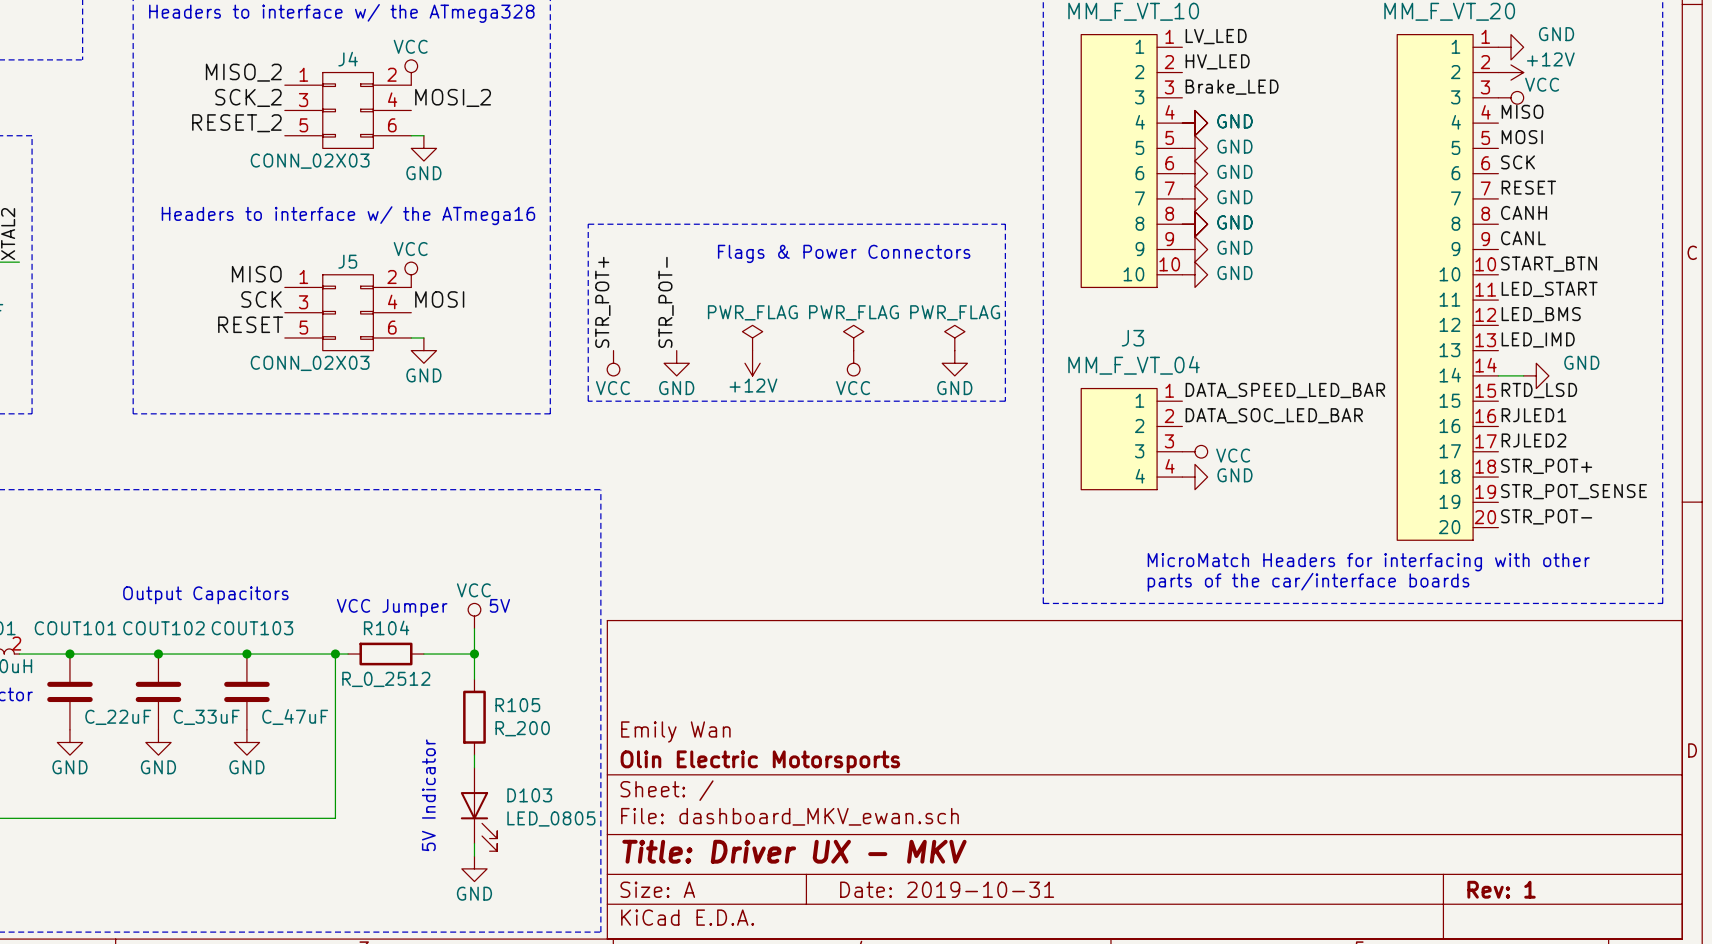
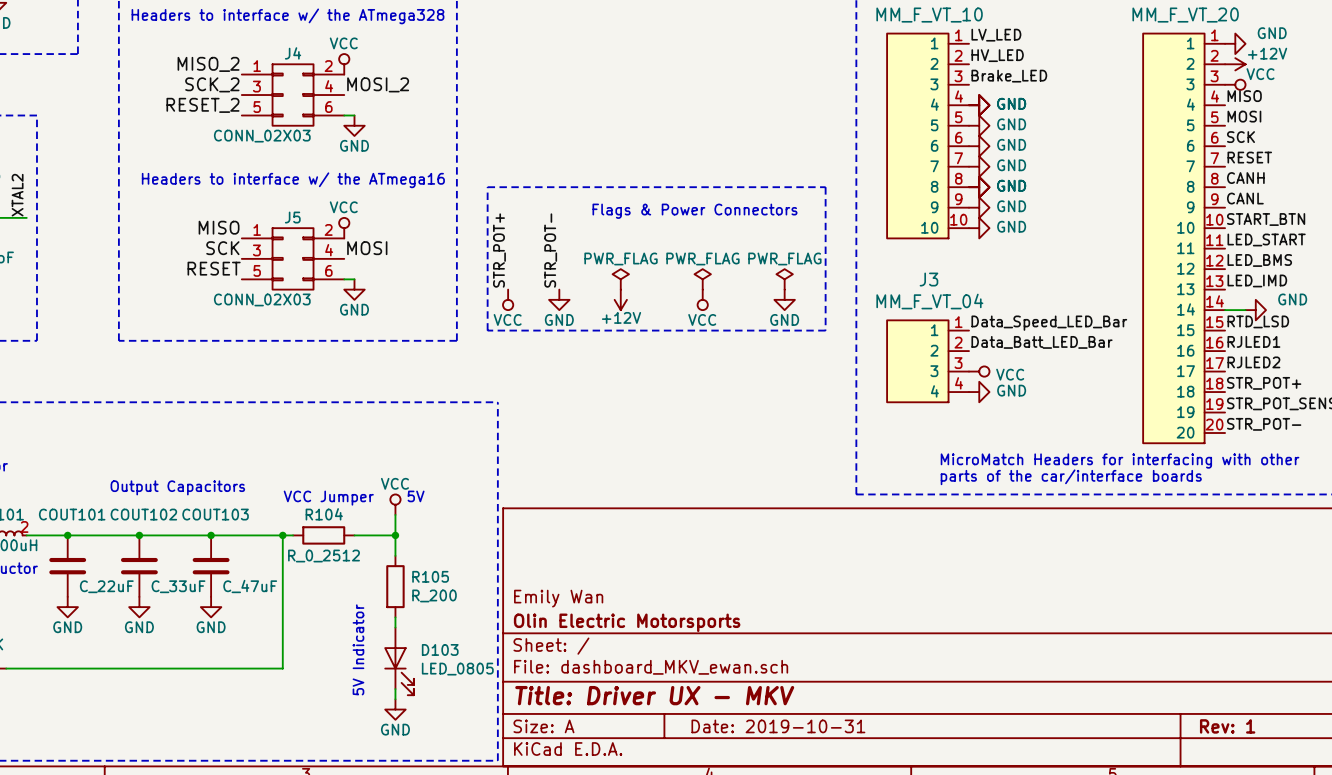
label: DATA_SPEED_LED_BAR (1285, 390) -> Data_Speed_LED_Bar (1049, 323)
label: DATA_SOC_LED_BAR (1274, 415) -> Data_Batt_LED_Bar (1042, 342)

